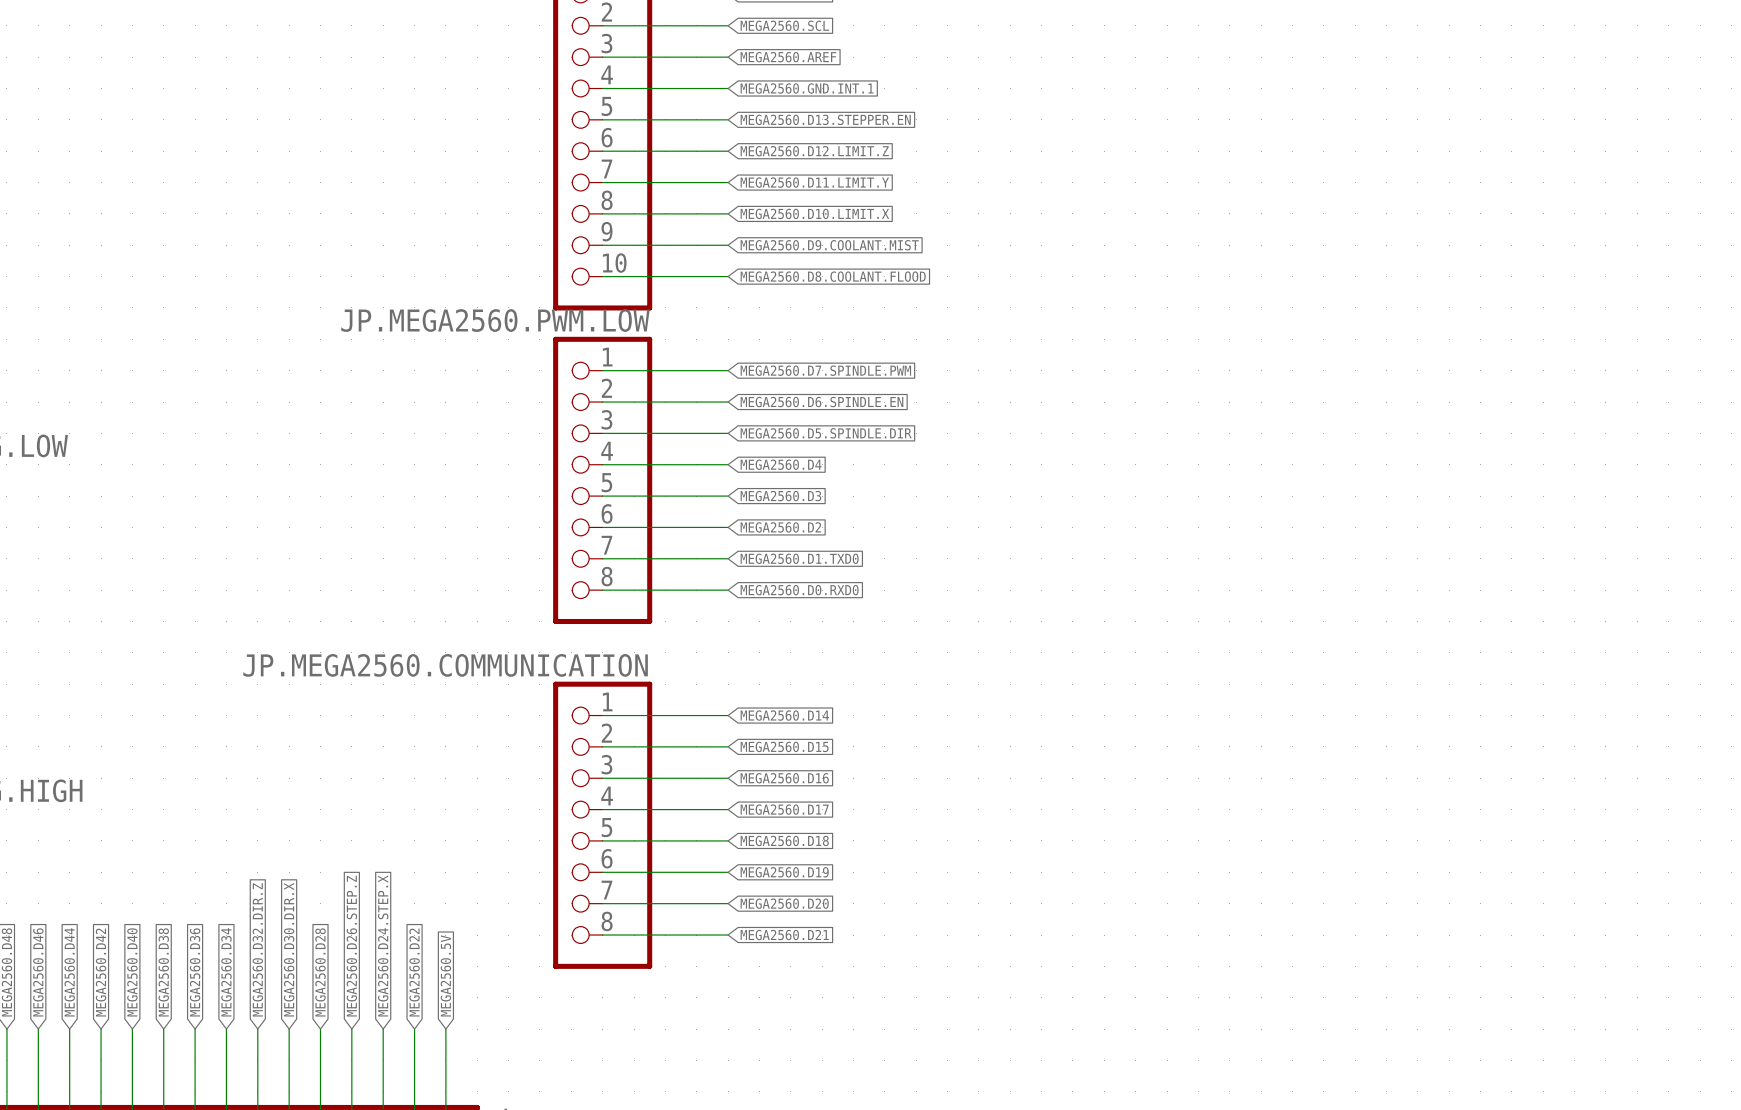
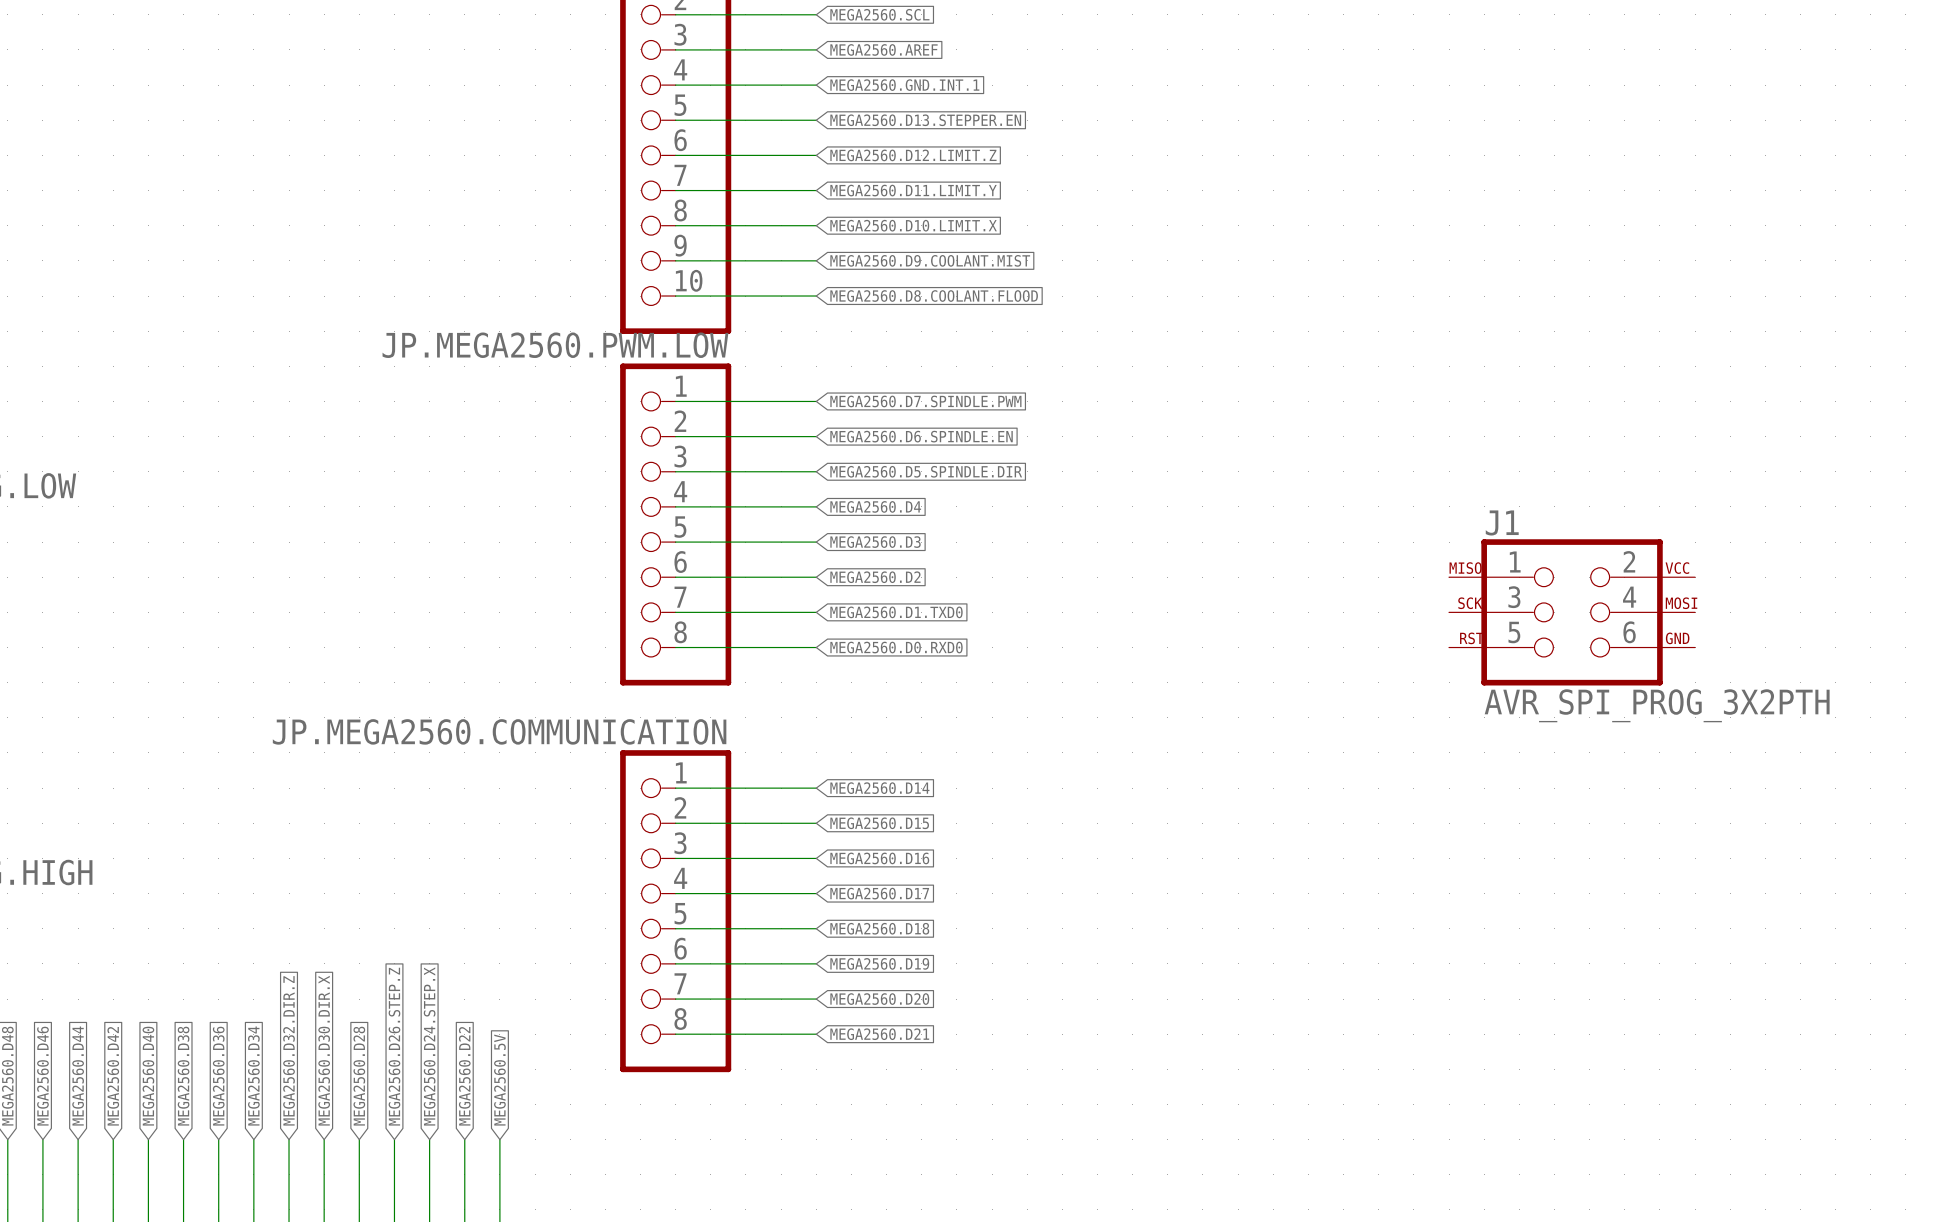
J1: none -> AVR_SPI_PROG_3X2PTH (1572, 612)

